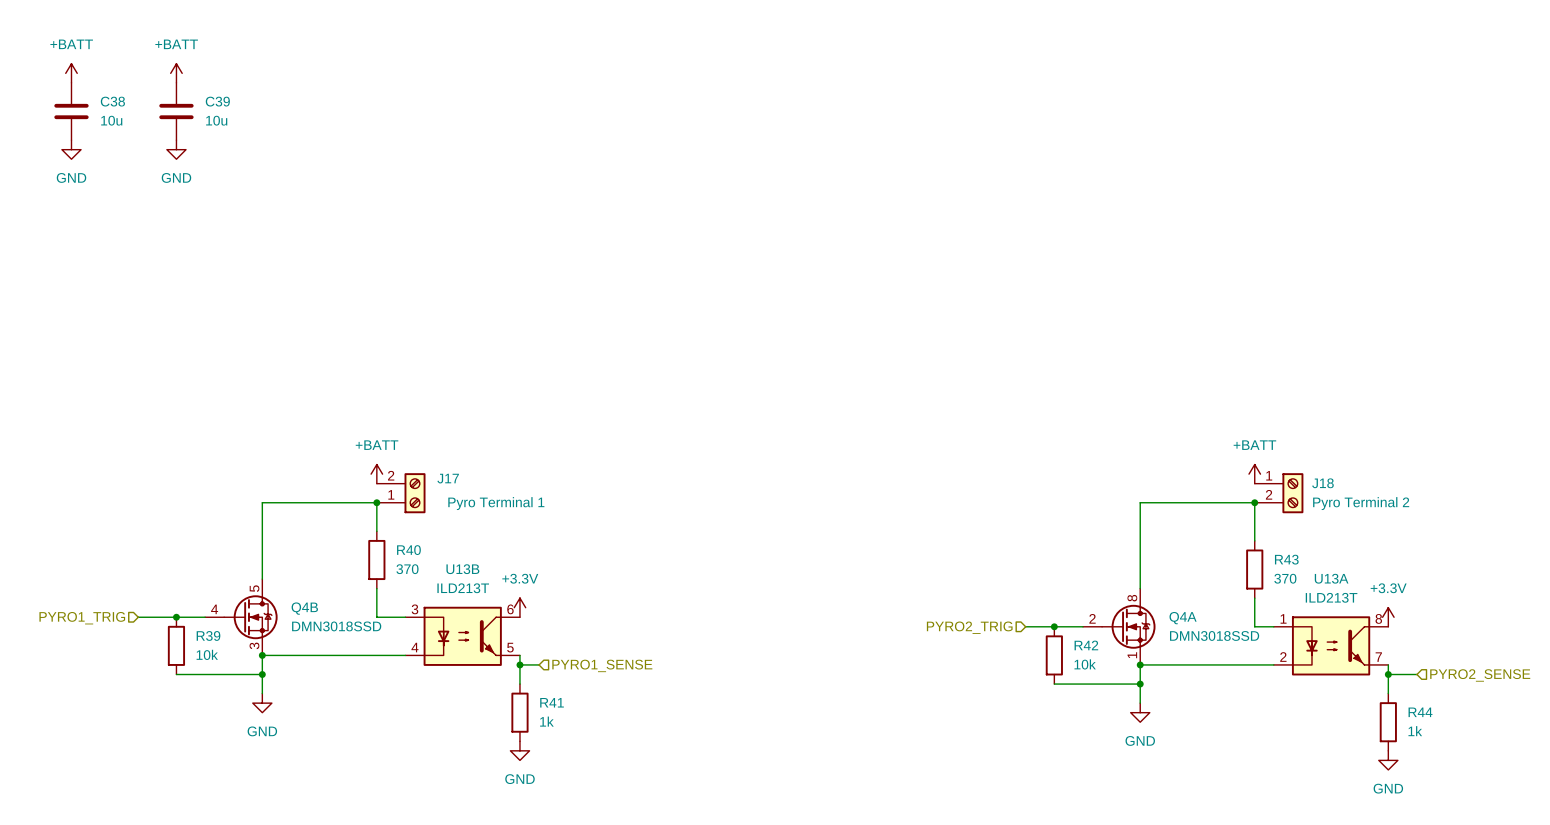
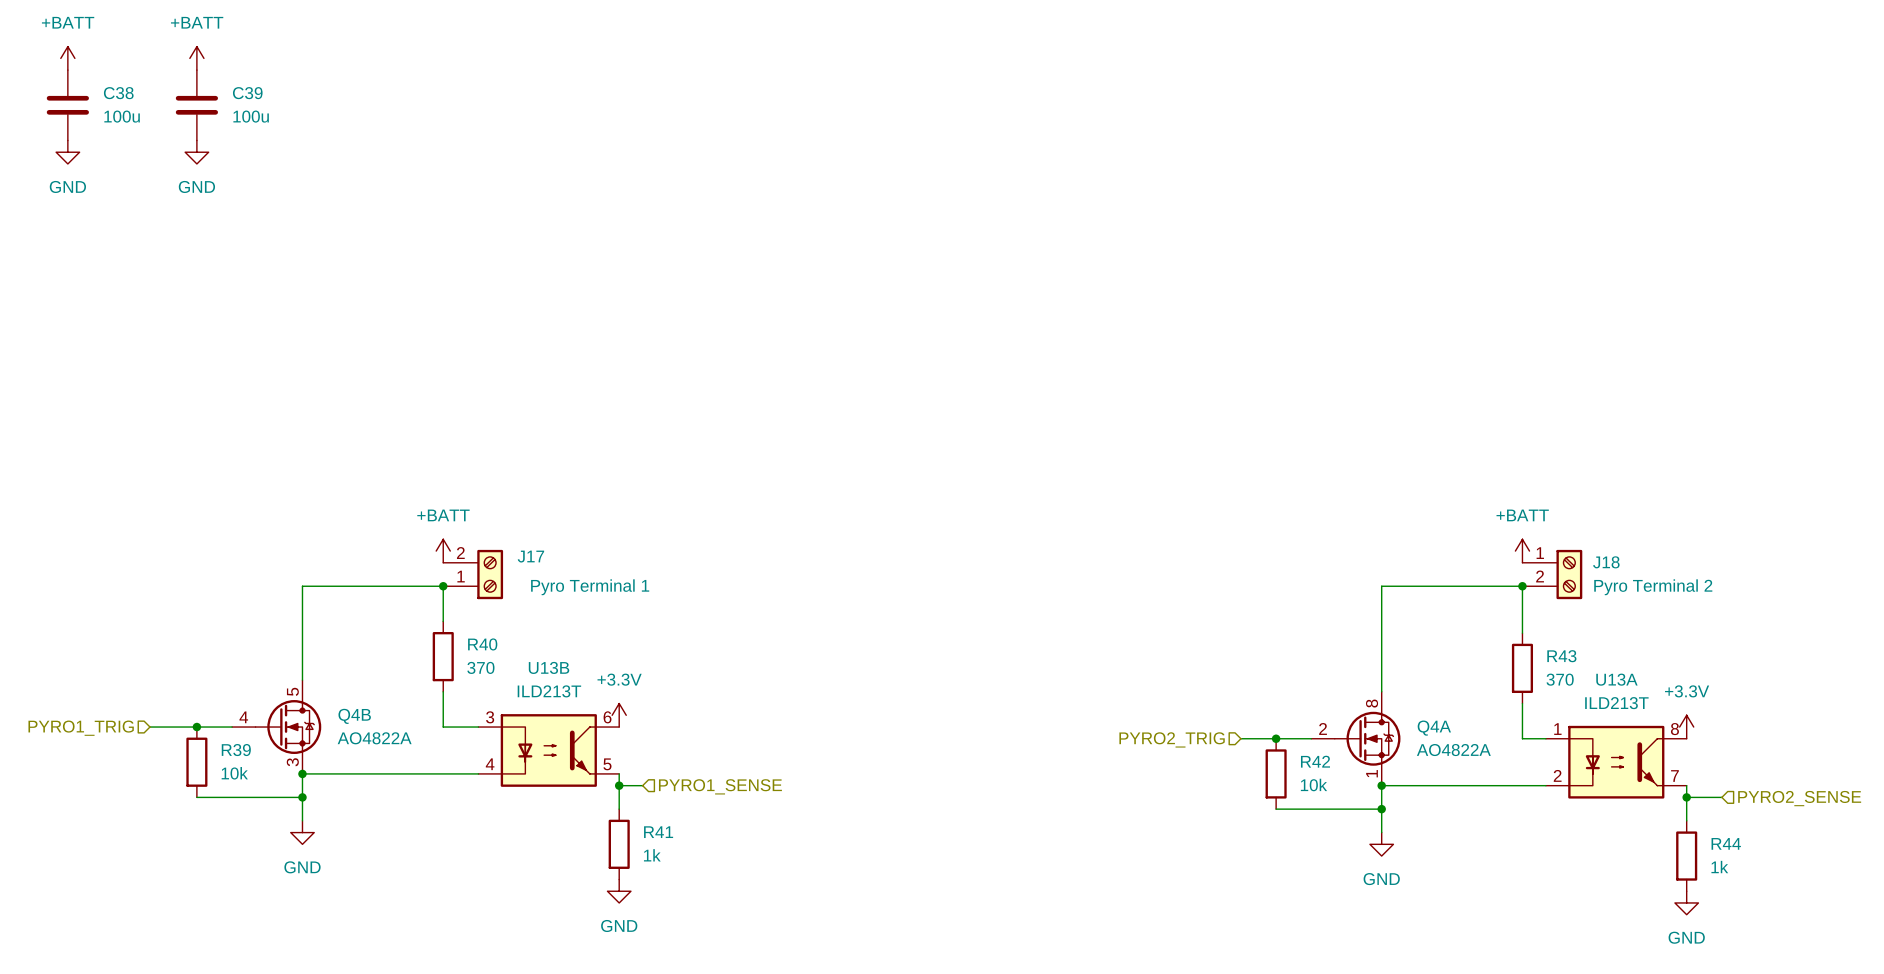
C38 value: 10u (111, 120) -> 100u (122, 116)
C39 value: 10u (216, 120) -> 100u (251, 116)
Q4B value: DMN3018SSD (336, 626) -> AO4822A (374, 738)
Q4A value: DMN3018SSD (1214, 635) -> AO4822A (1453, 750)

